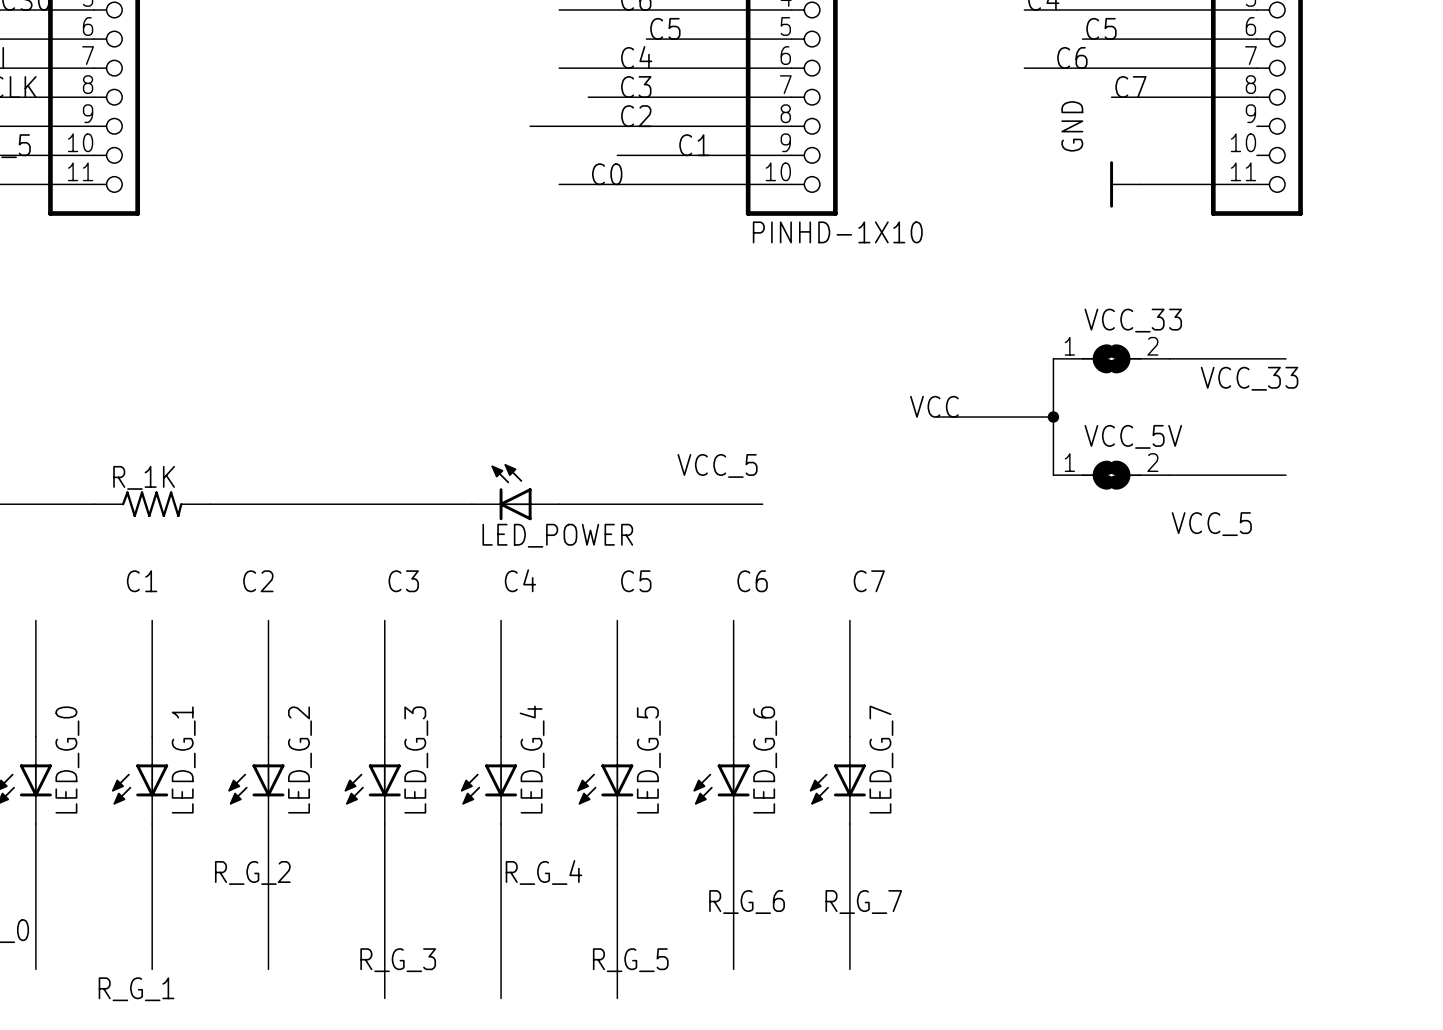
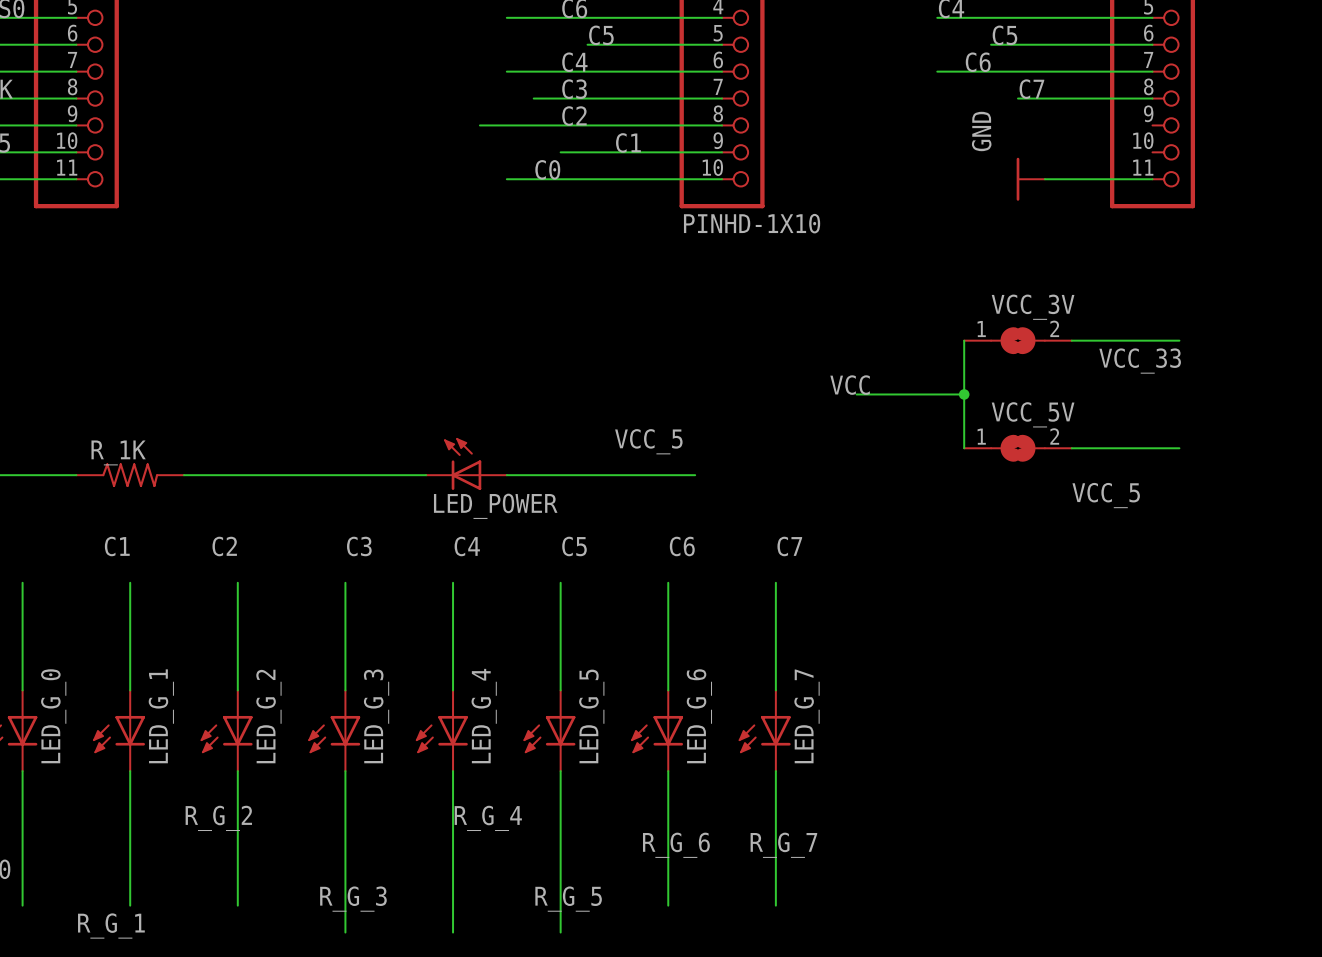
VCC_33 name: VCC_33 (1133, 320) -> VCC_3V (1033, 307)

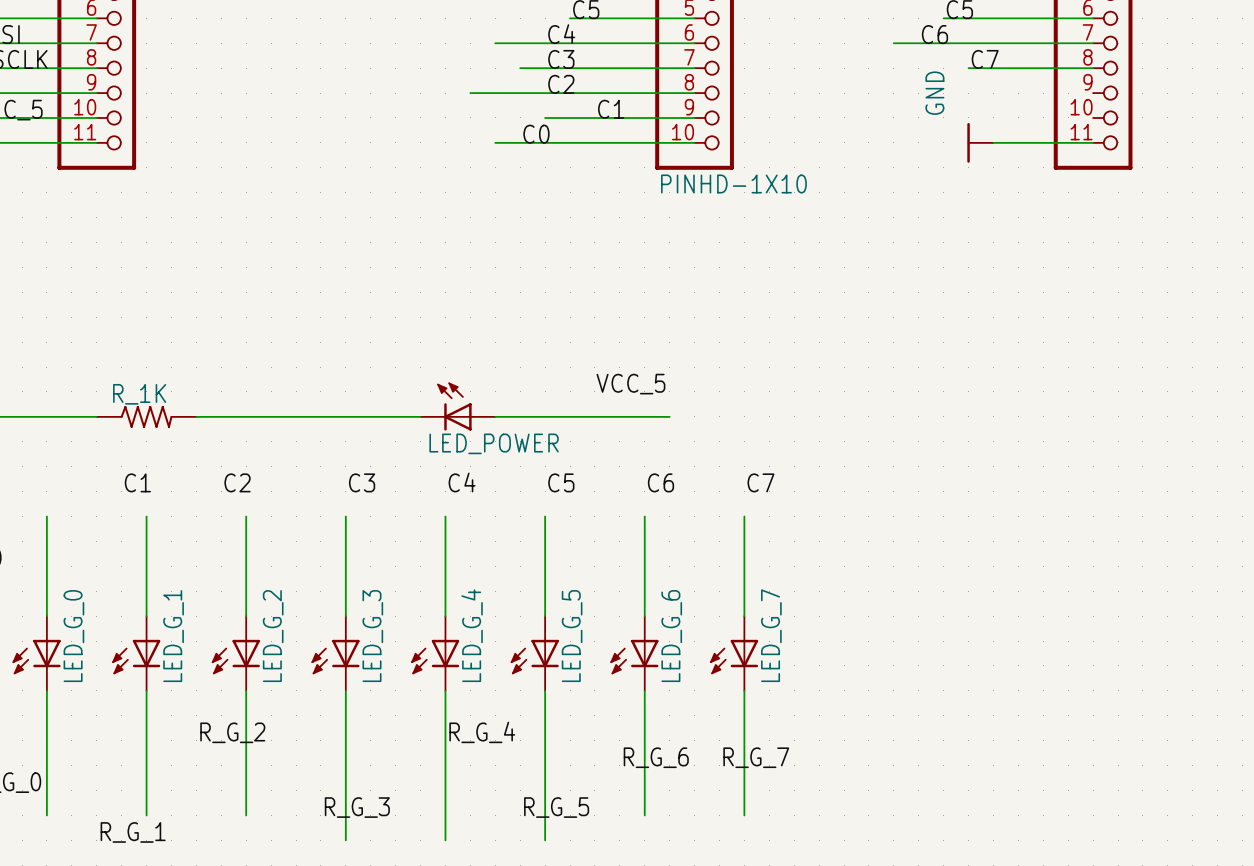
wire: (964, 340) (964, 448) -> none
VCC_3V: (1018, 340) -> none
wire: (1071, 340) (1179, 340) -> none
label: VCC_33 (1140, 361) -> none
label: VCC (850, 385) -> none
wire: (856, 394) (964, 394) -> none
junction: (964, 394) -> none
VCC_5V: (1018, 448) -> none
wire: (1071, 448) (1179, 448) -> none
label: VCC_5 (1106, 495) -> none

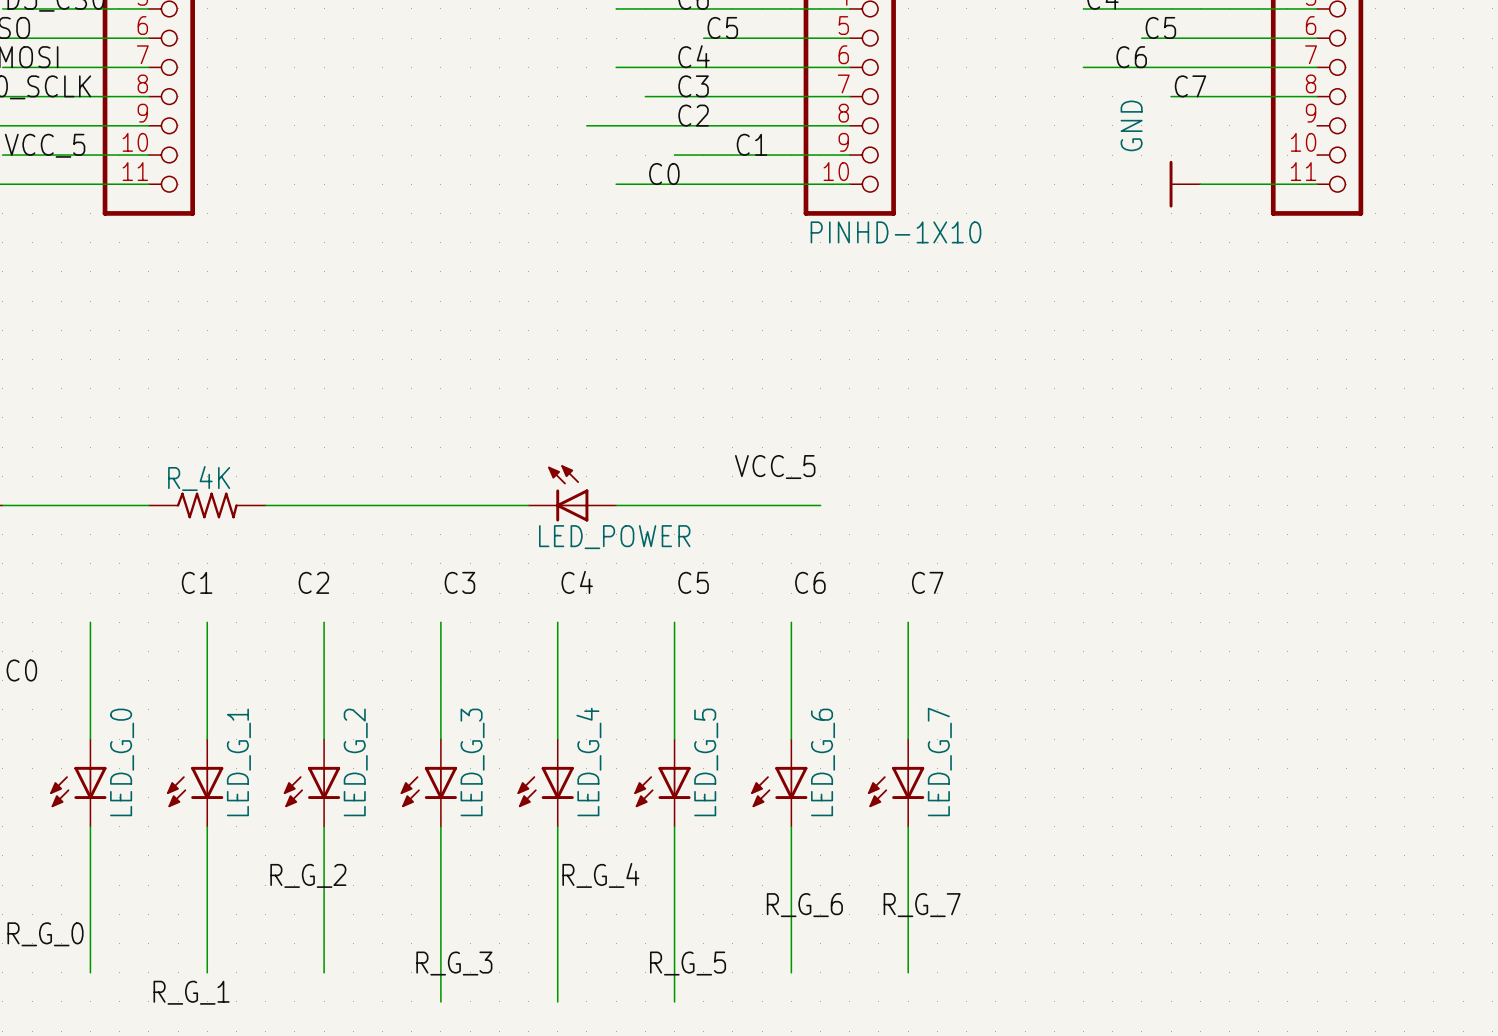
R_1K name: R_1K (139, 394) -> R_4K (199, 478)

